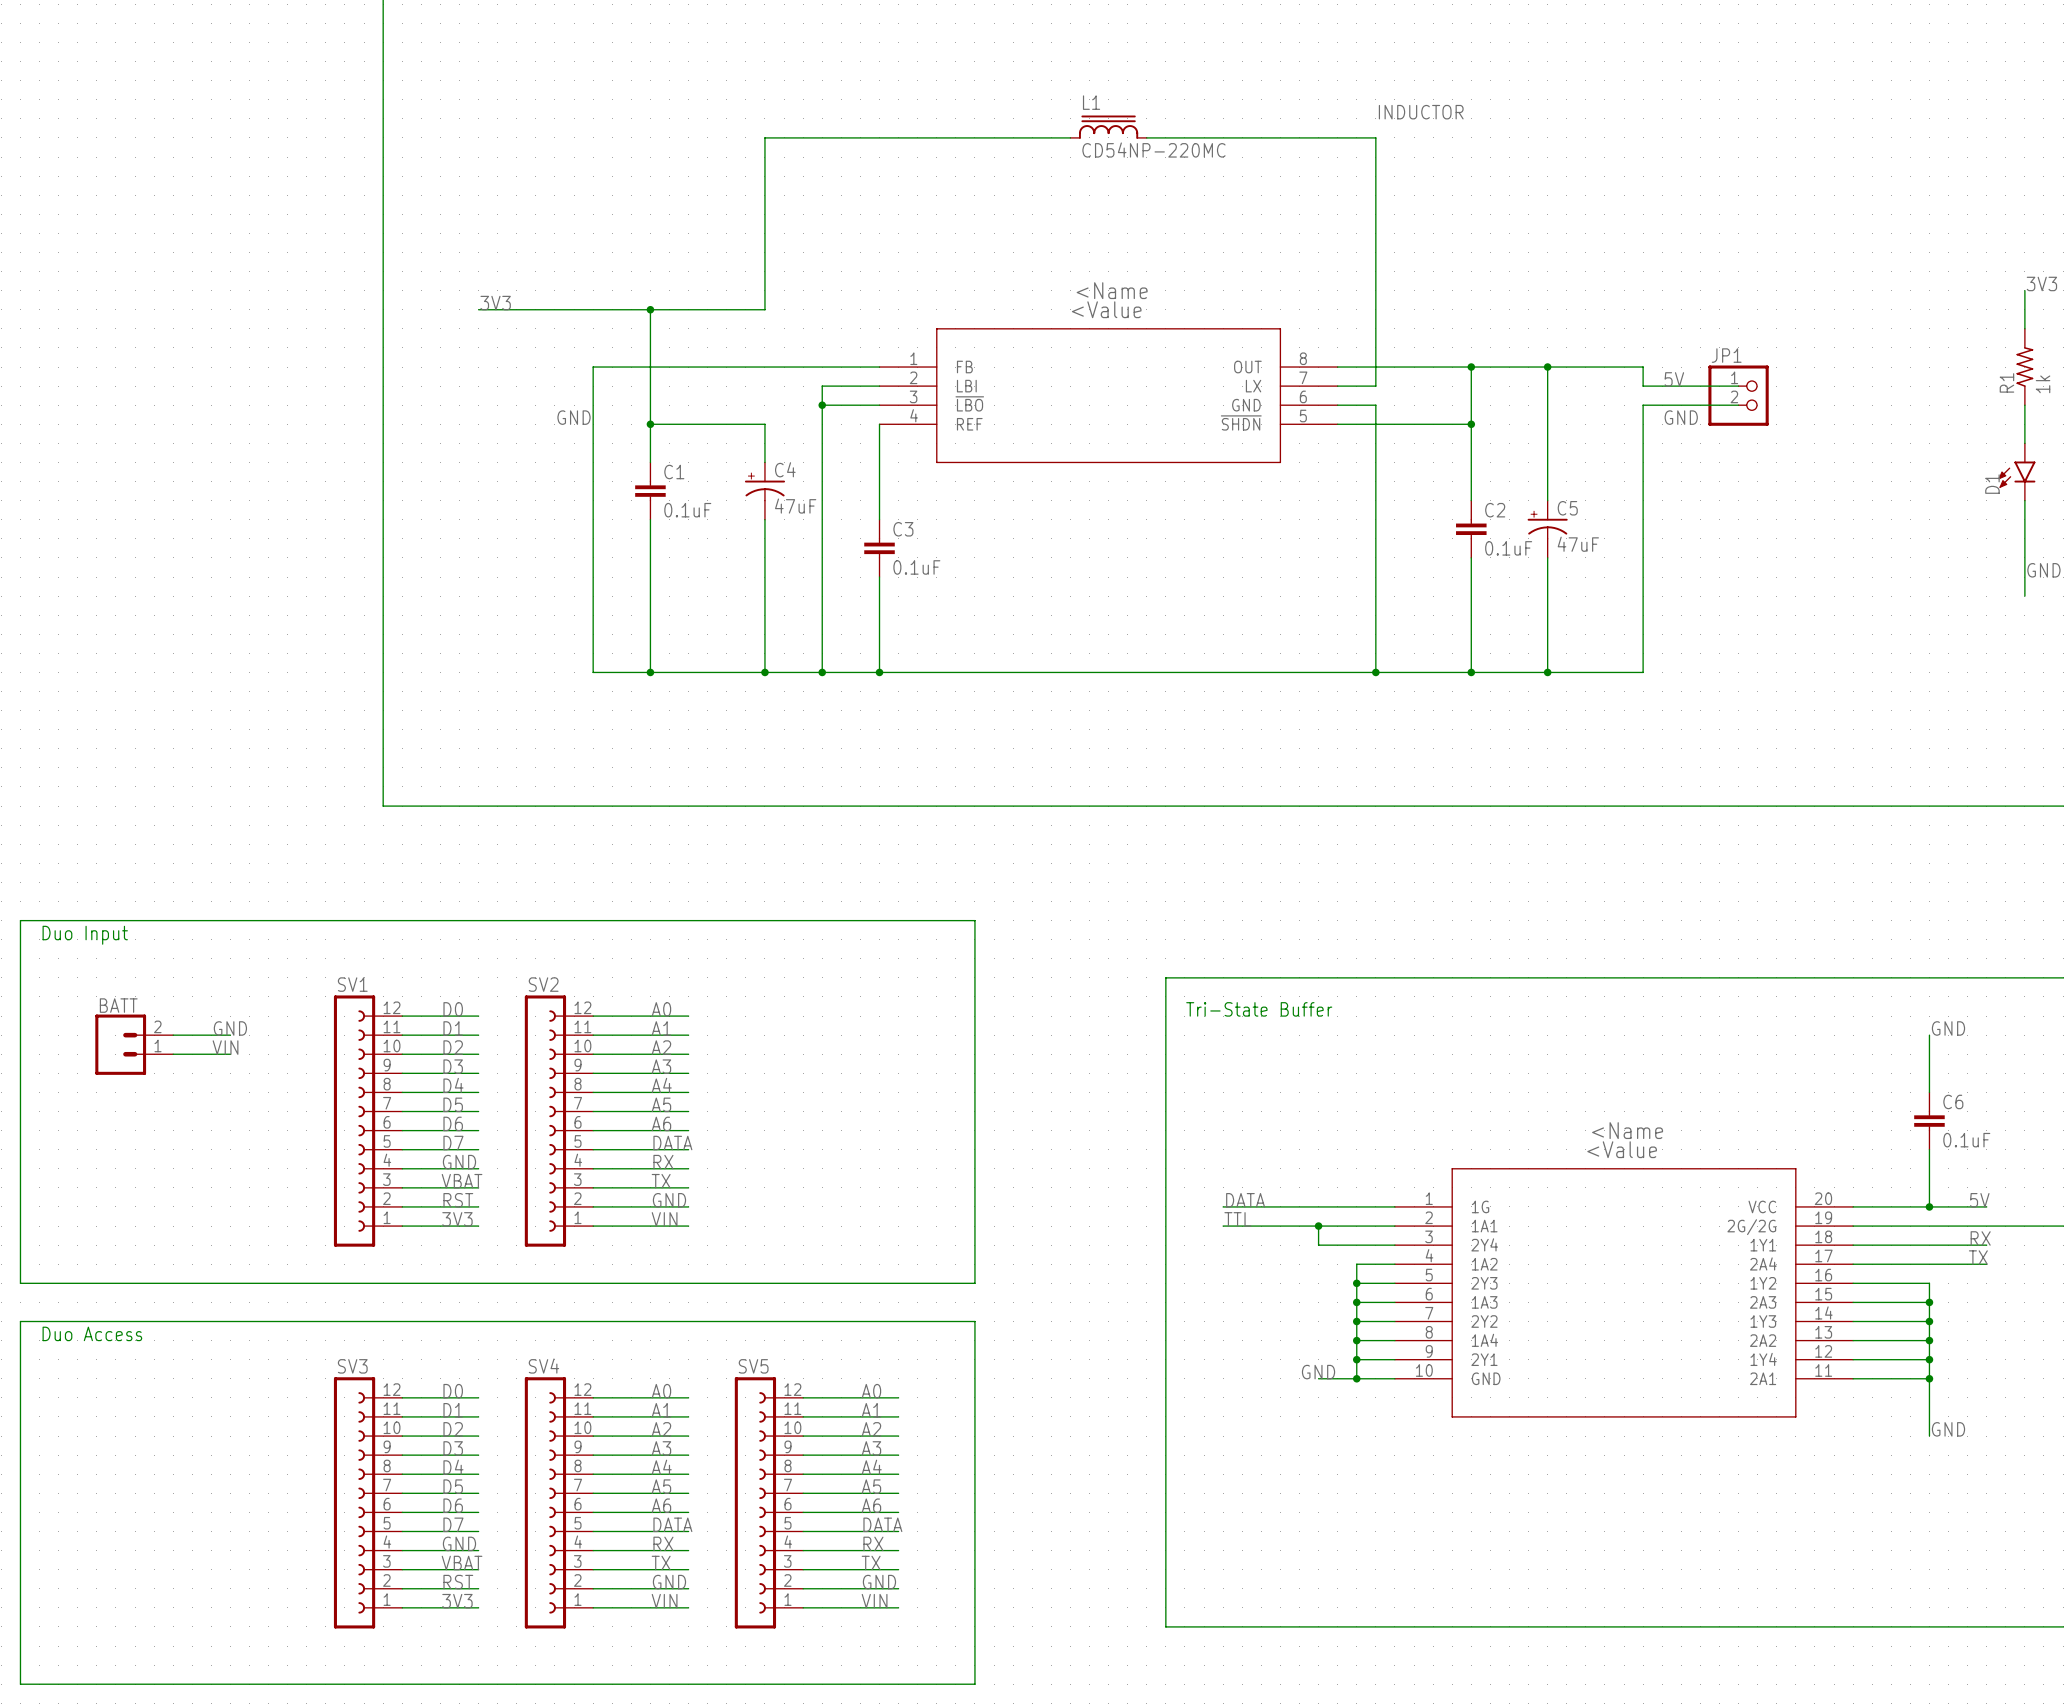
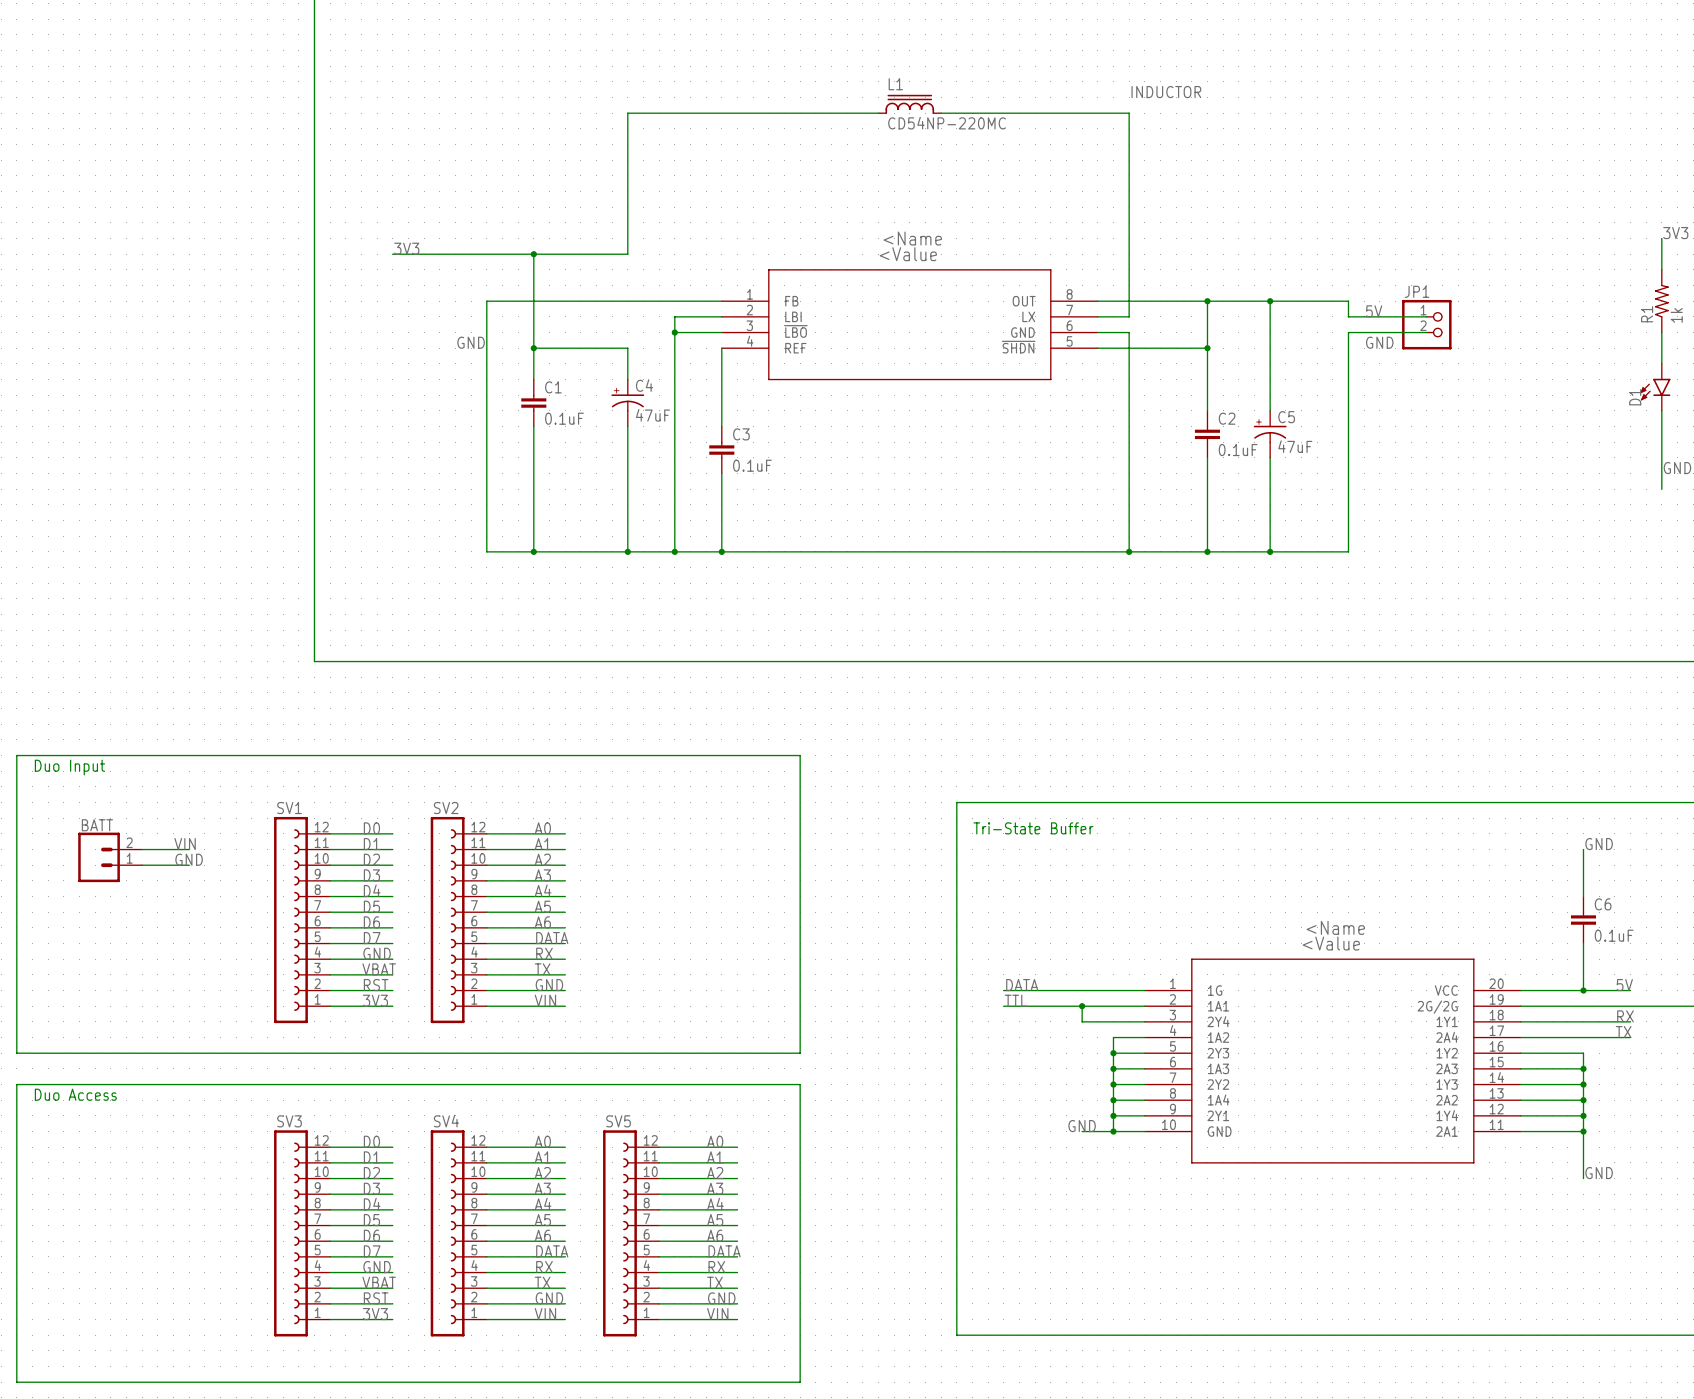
label: GND (230, 1028) -> VIN (185, 844)
label: VIN (225, 1047) -> GND (189, 859)

